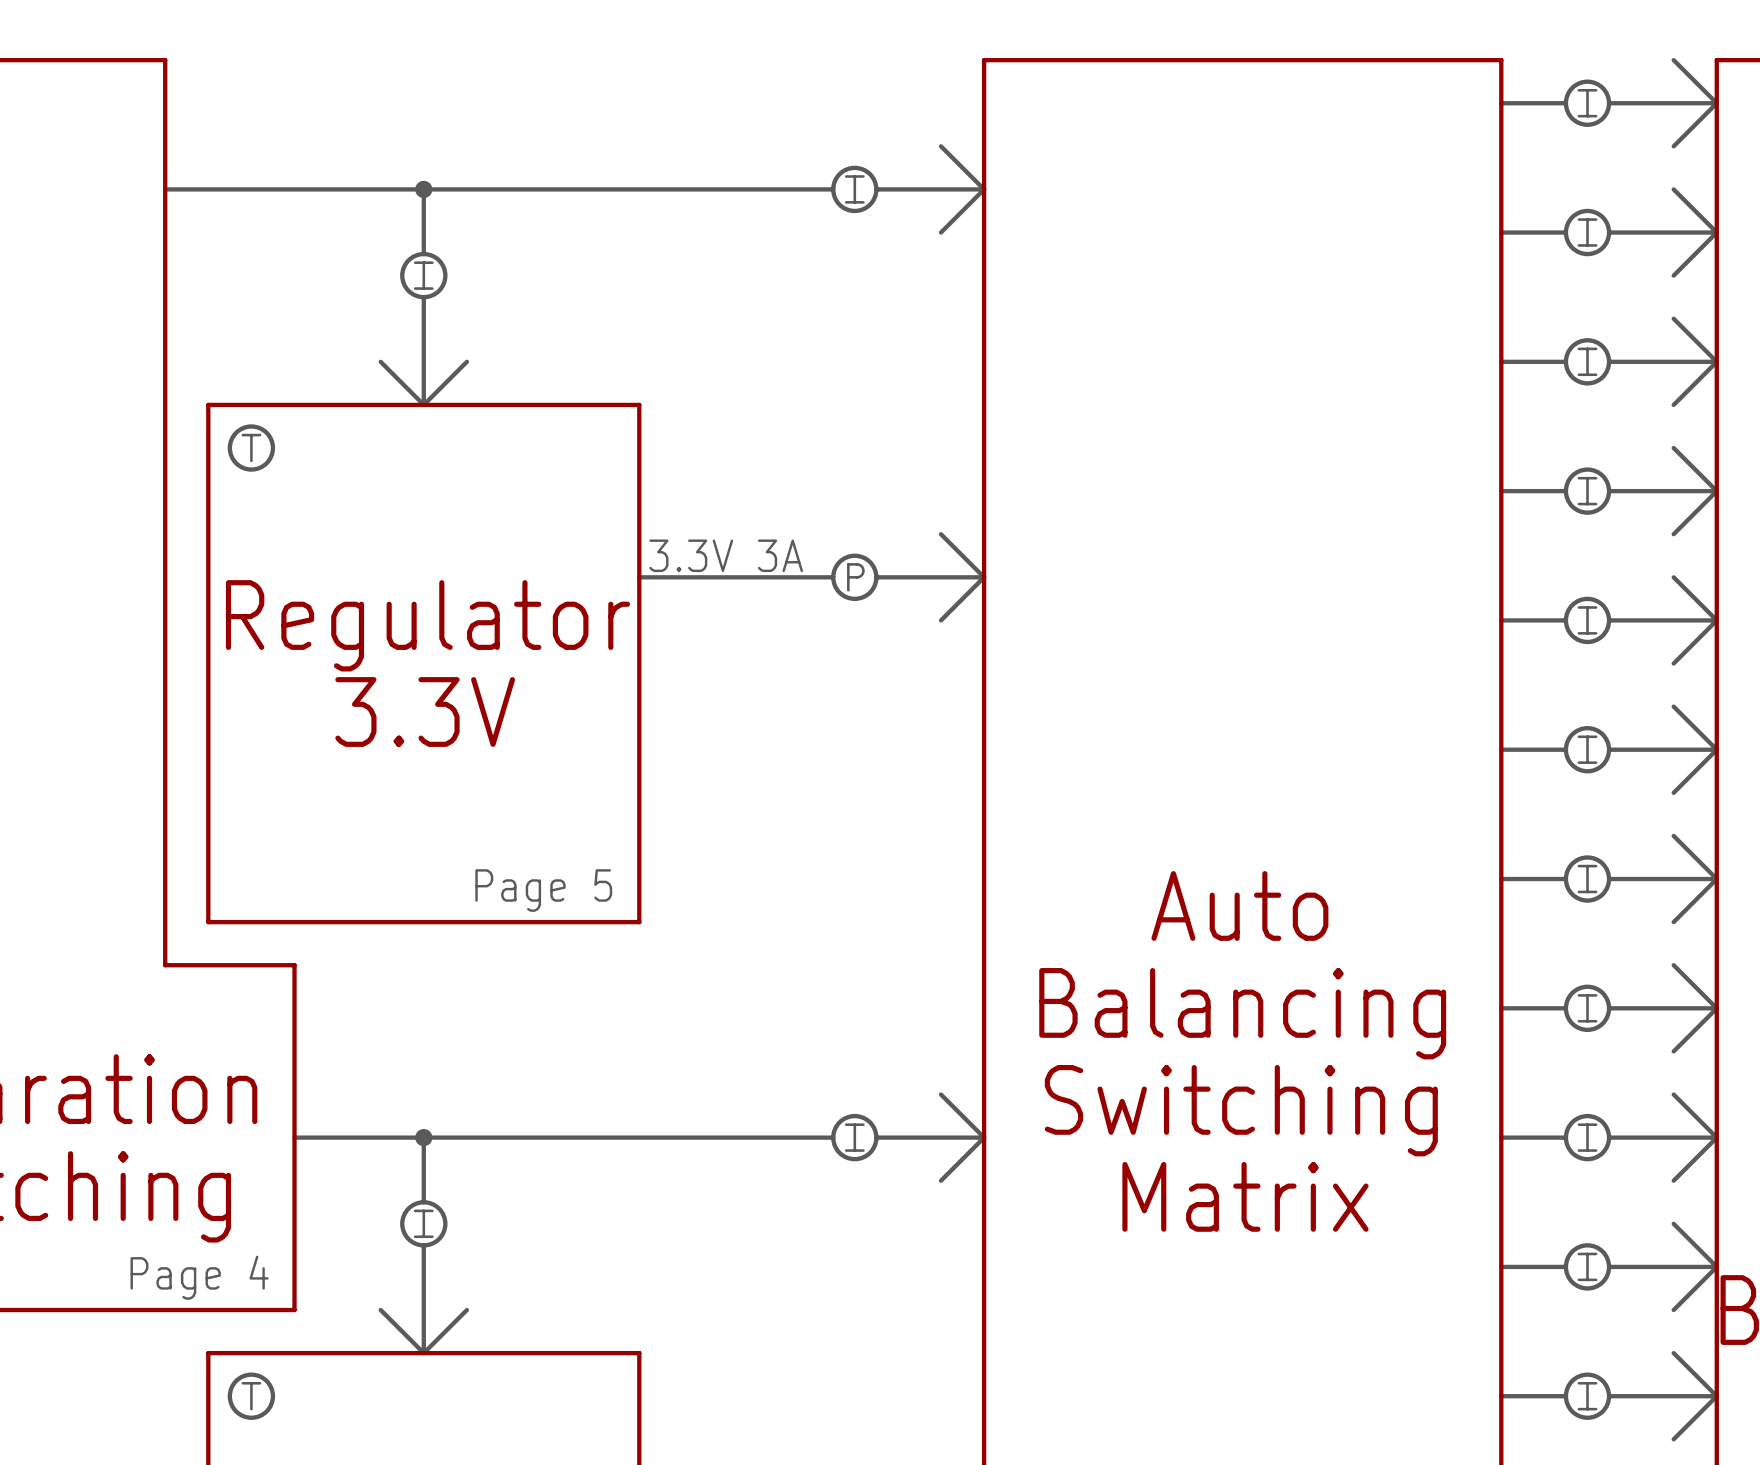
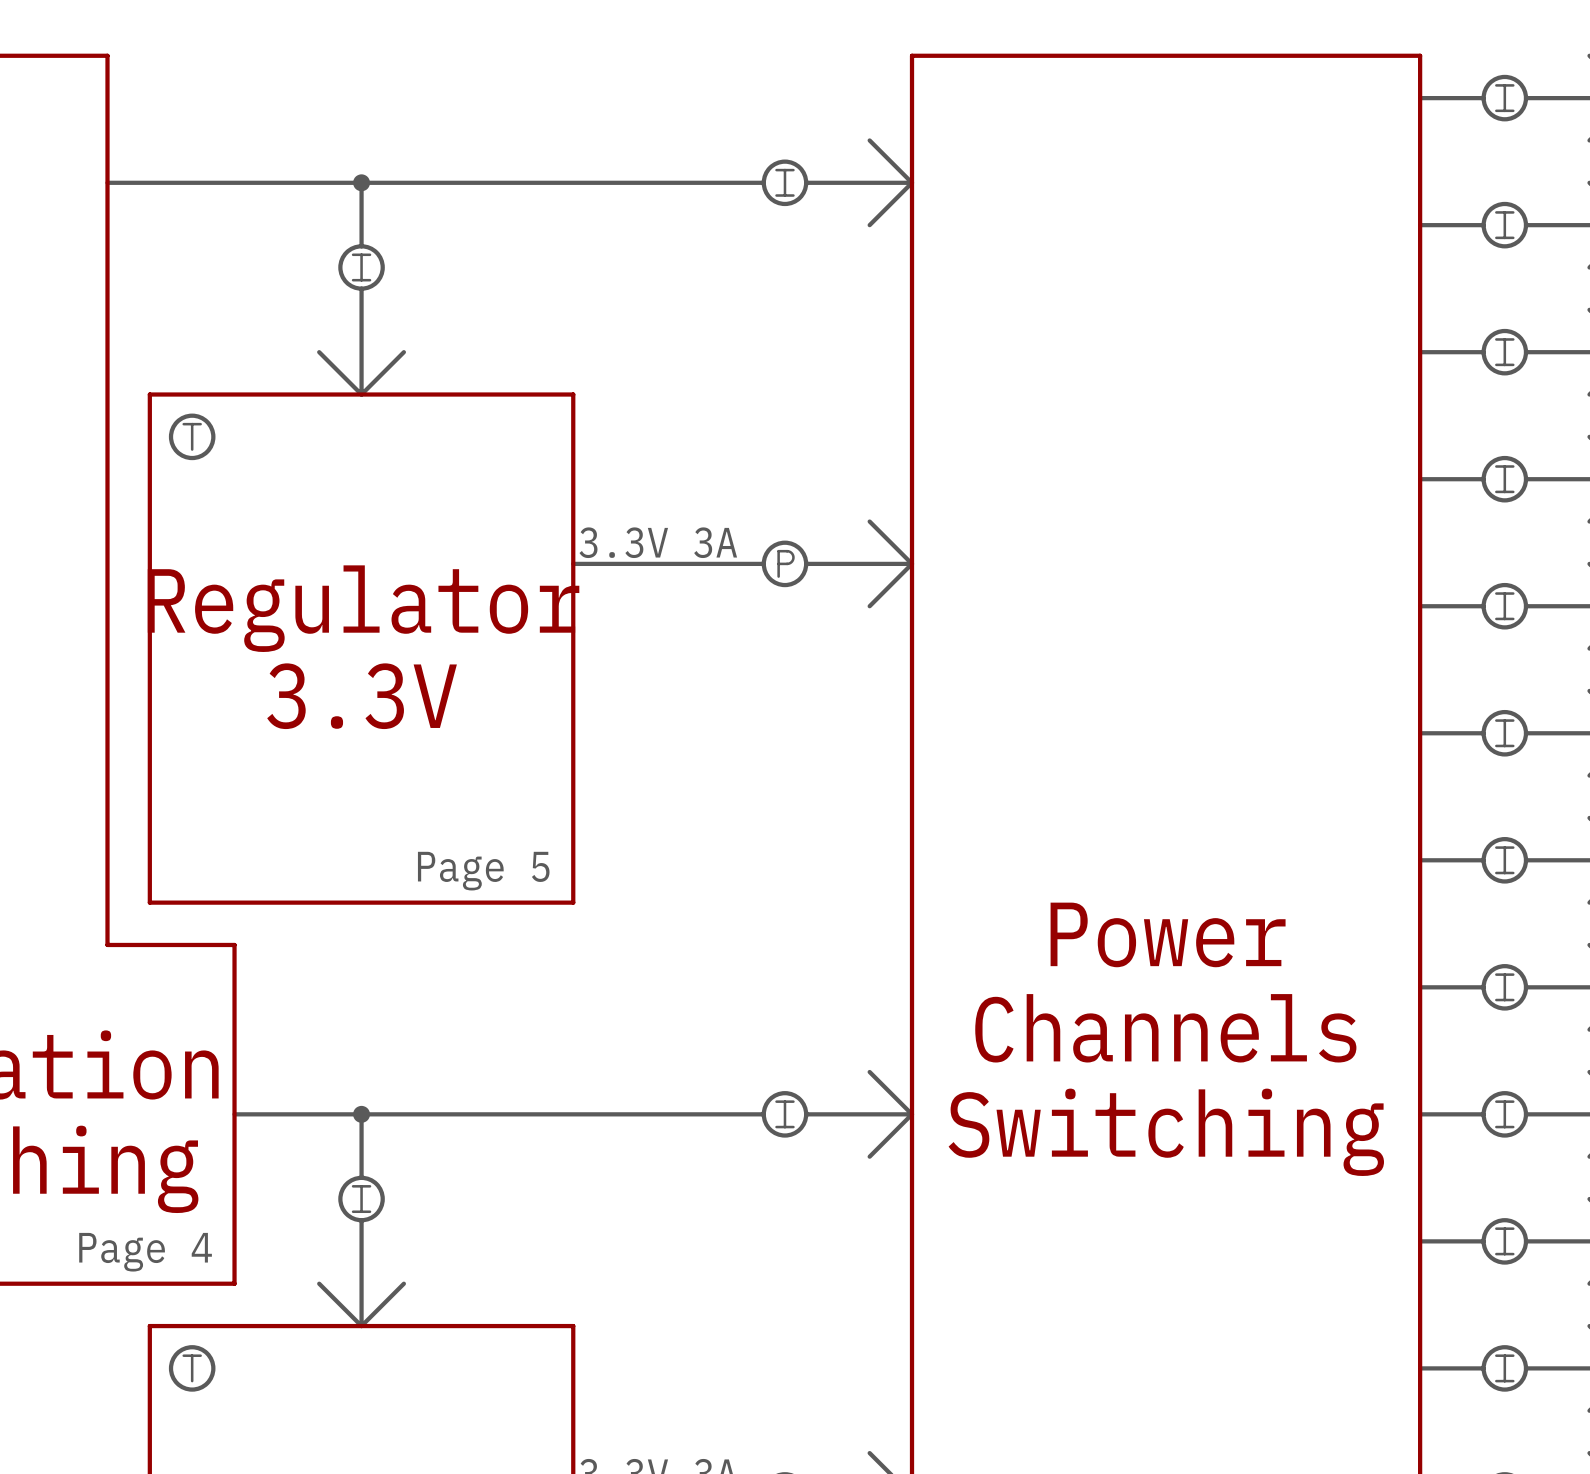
text: Auto (1239, 905) -> none
text: none -> Power (1168, 934)
text: Balancing (1242, 1013) -> none
text: none -> Channels (1165, 1028)
text position: Switching (1241, 1110) -> Switching (1166, 1132)
text: Matrix (1245, 1196) -> none

